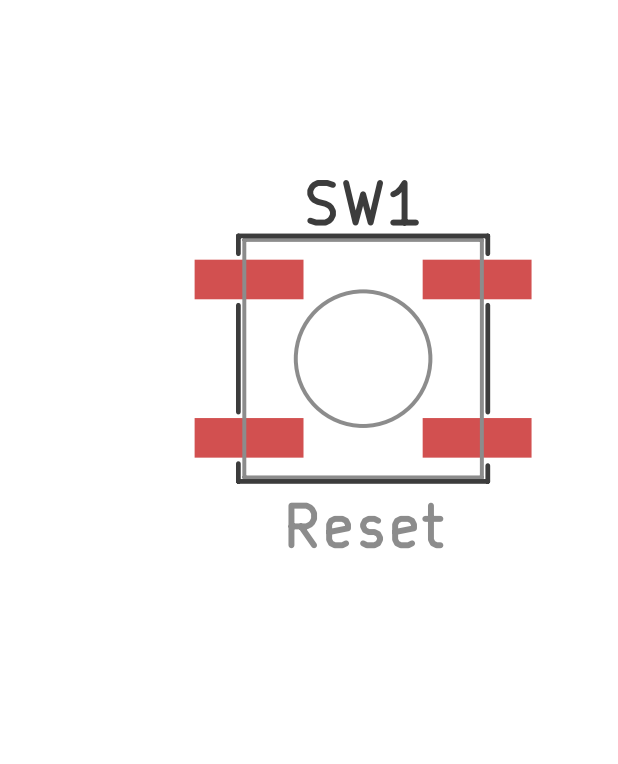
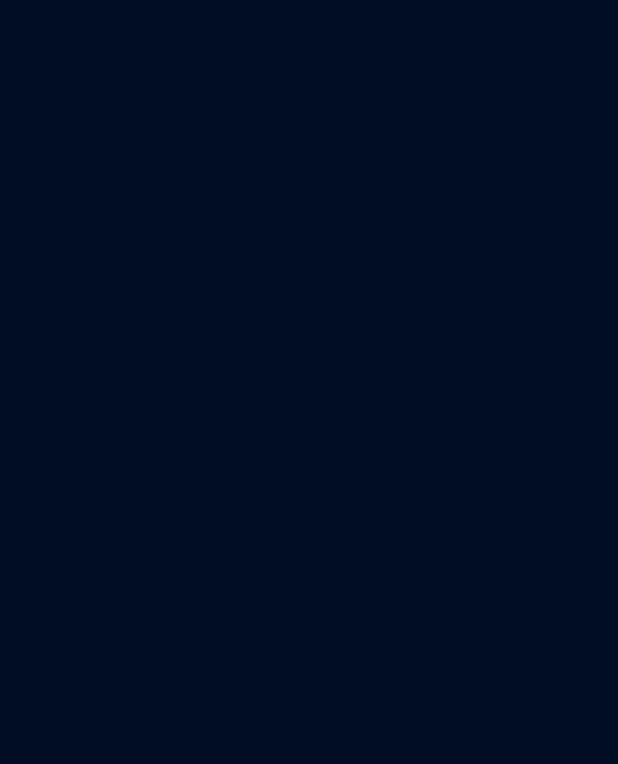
SW1: Reset (363, 358) -> none

